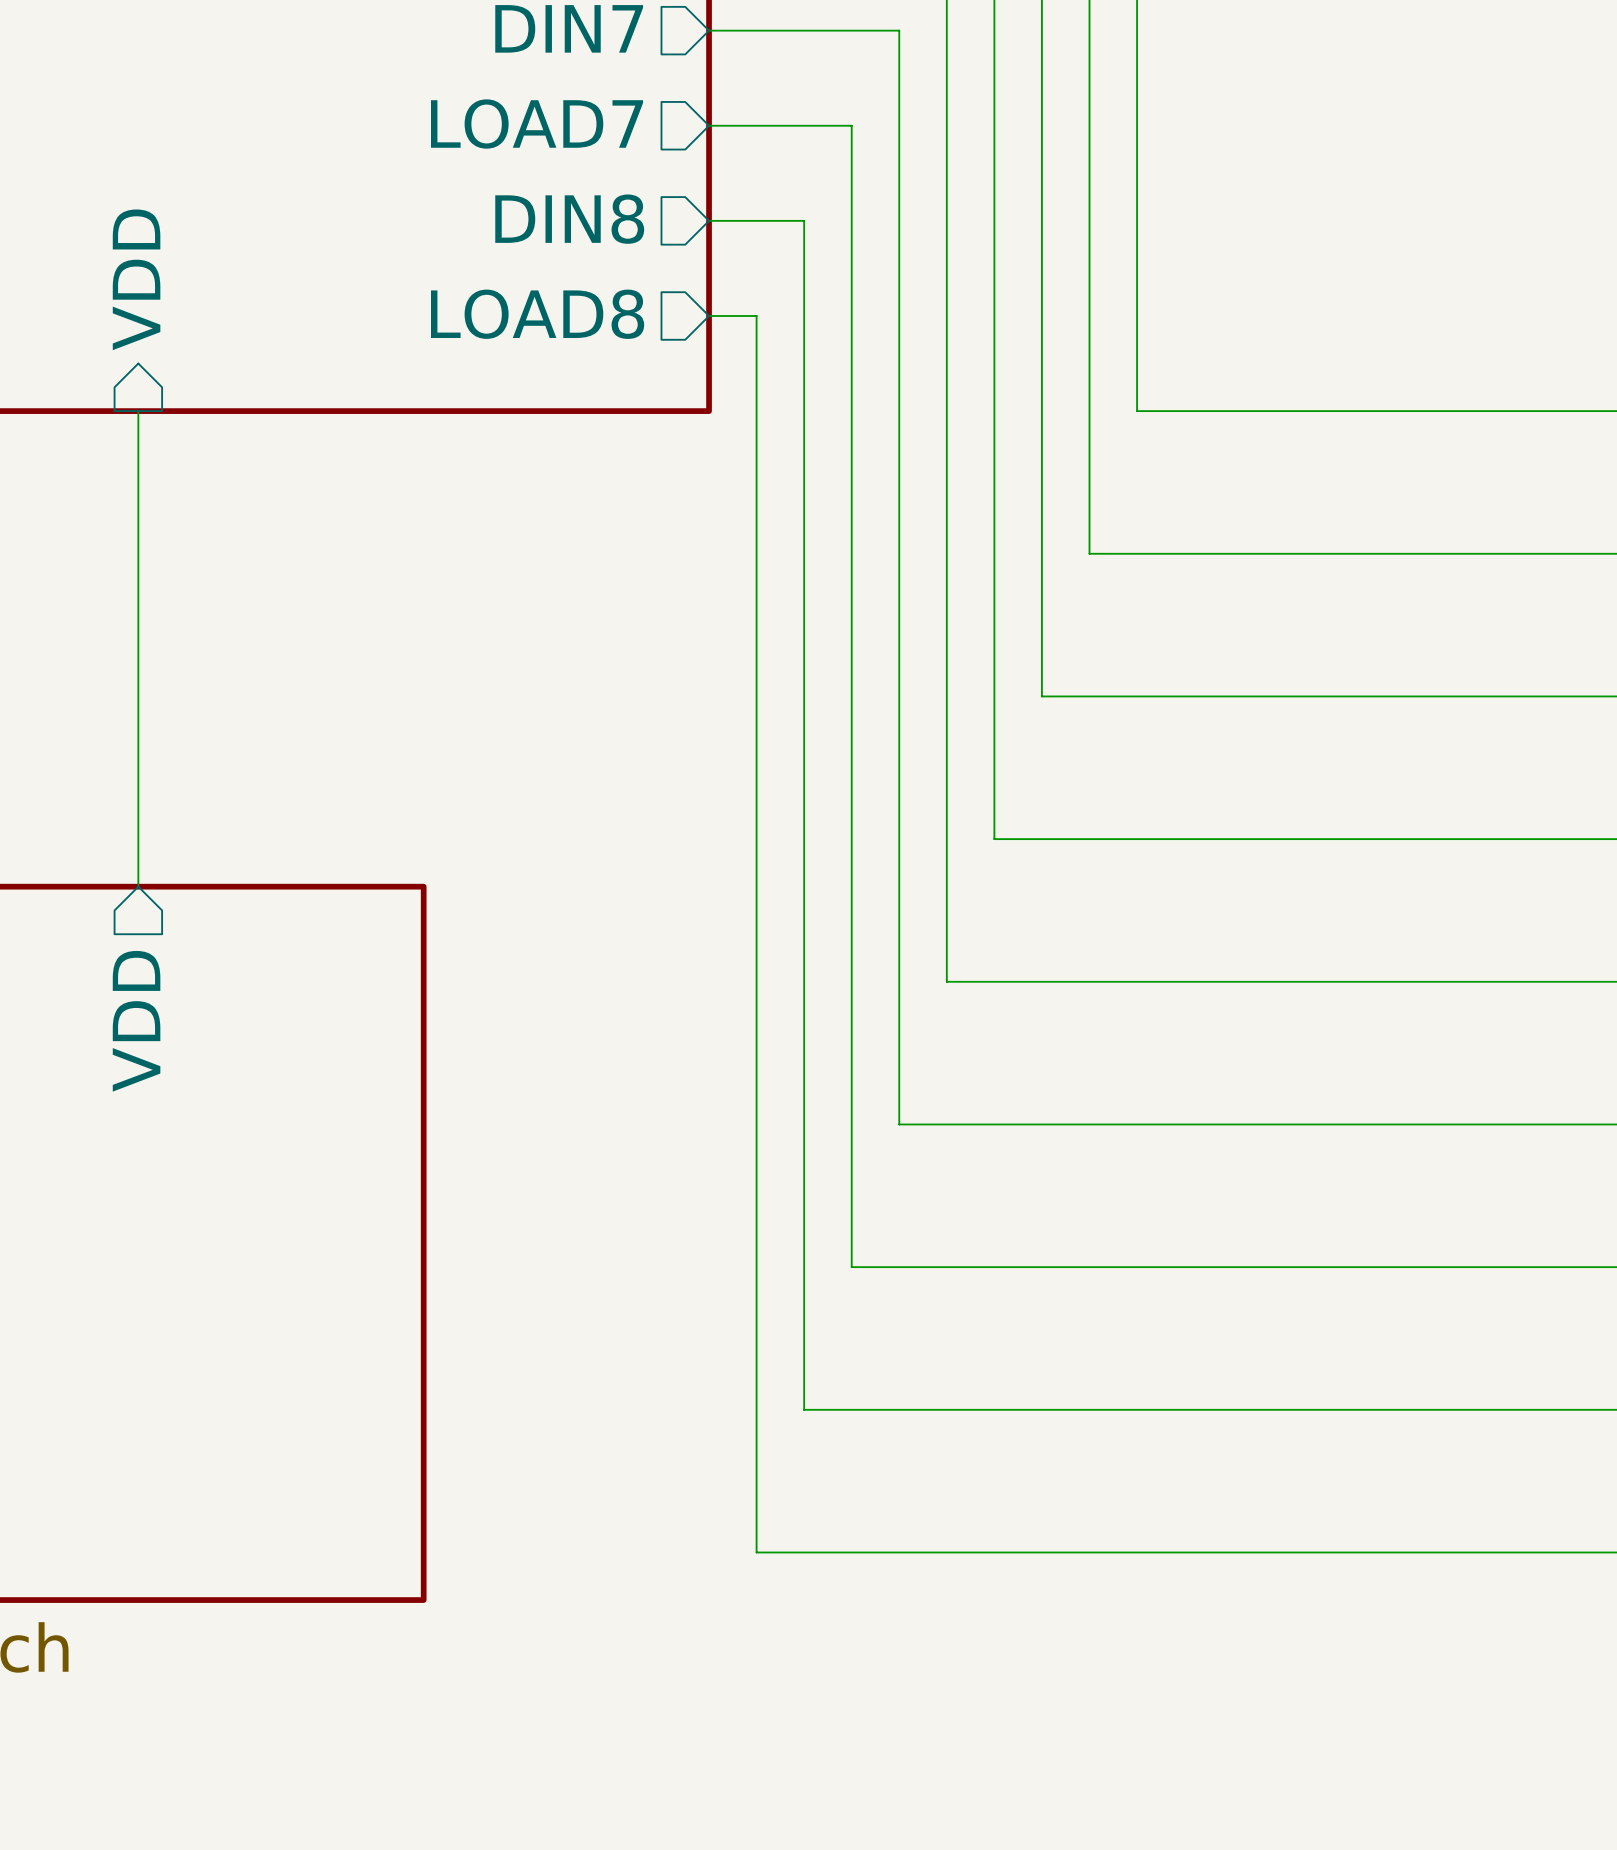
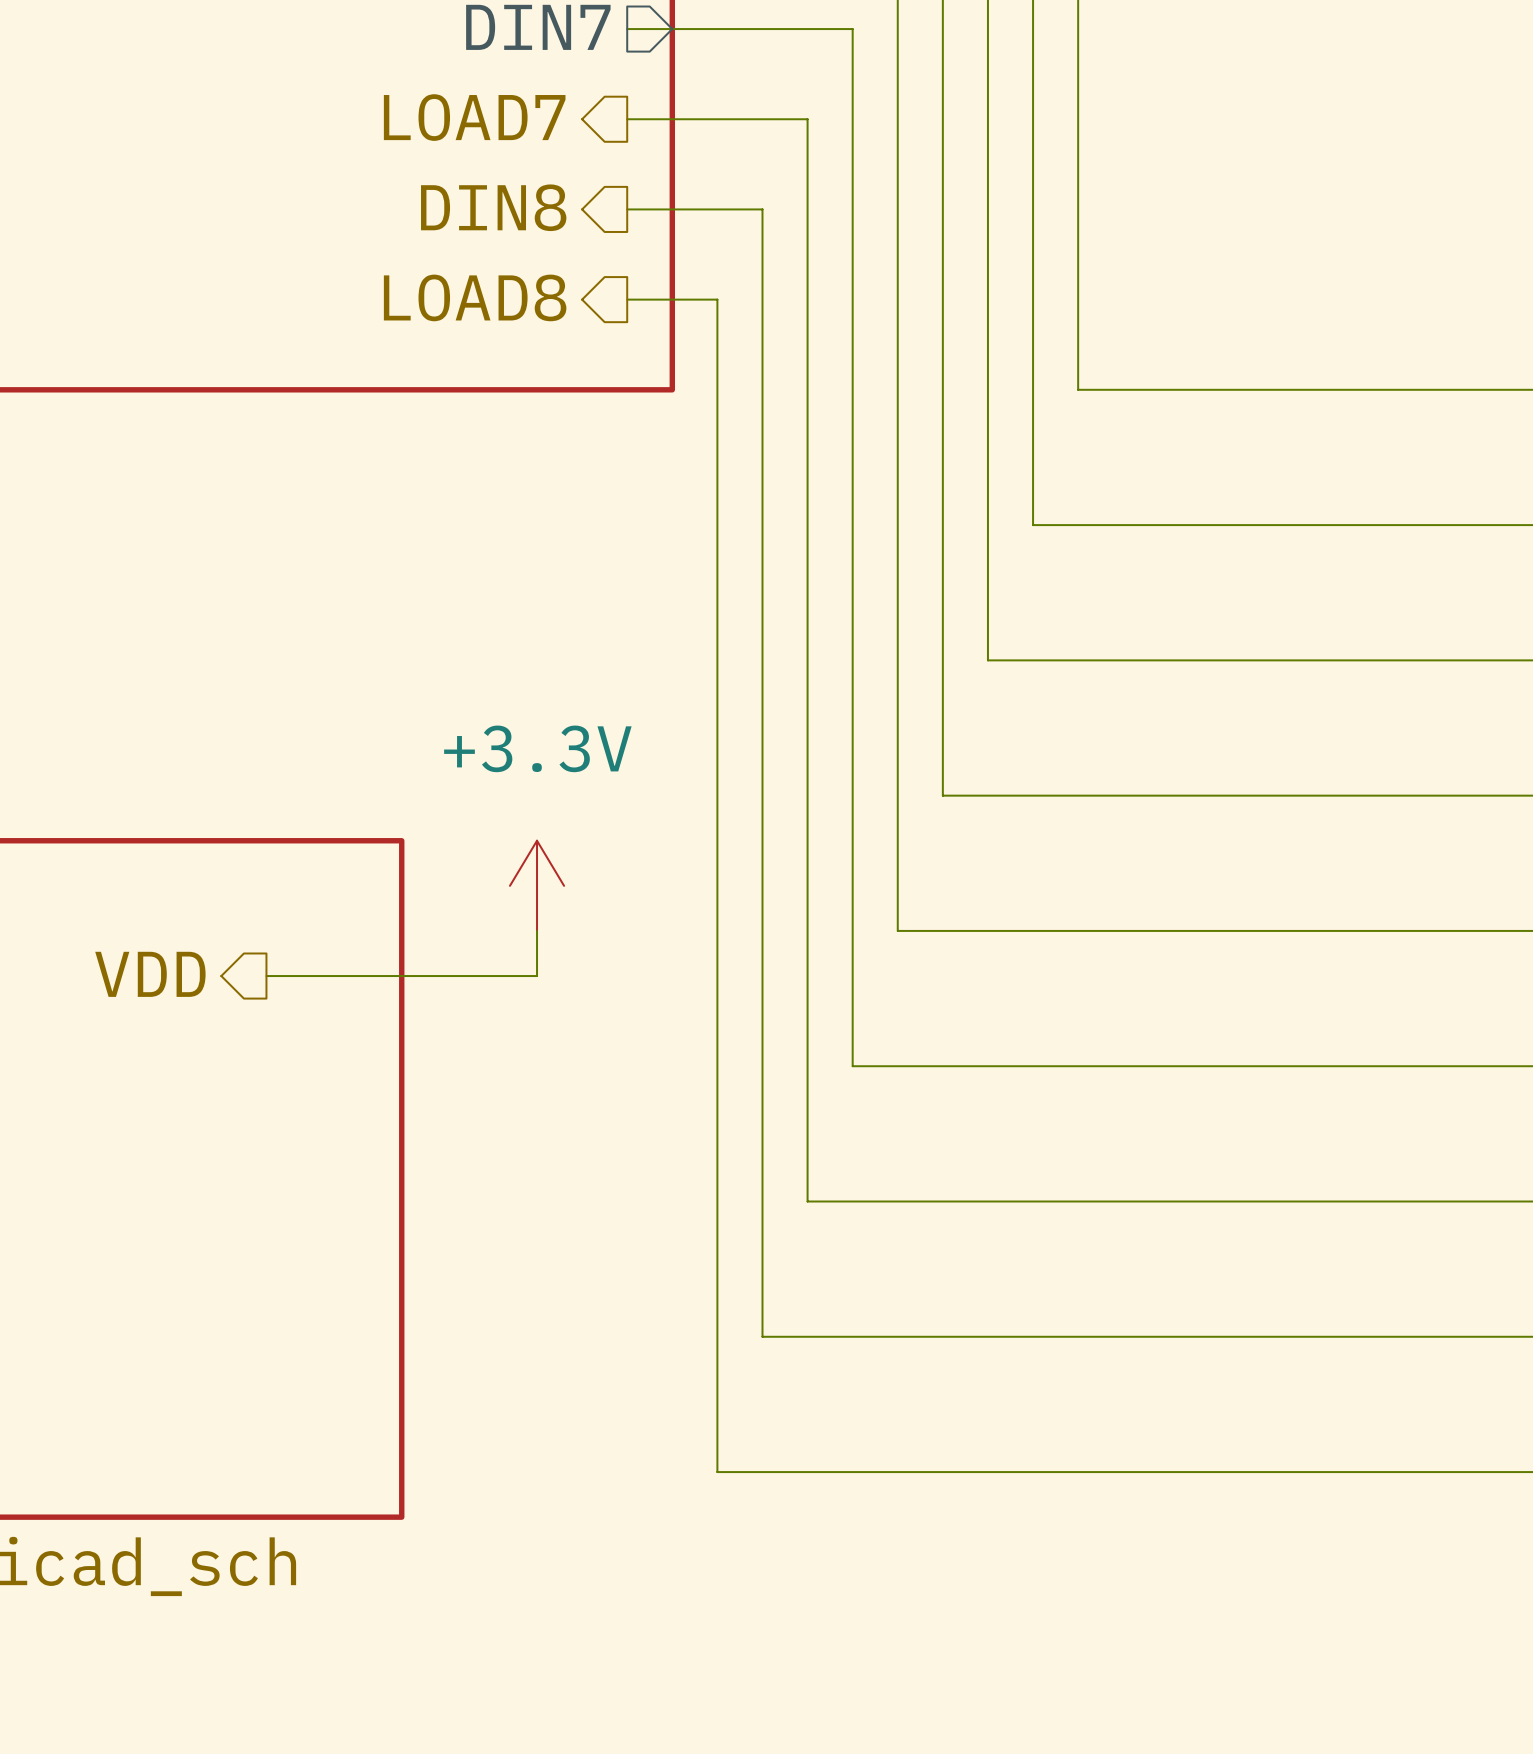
wire: none -> (627, 29) (672, 29)
hierarchical label: none -> LOAD7 (474, 117)
sheet pin: LOAD7 (537, 124) -> none
wire: none -> (627, 119) (672, 119)
hierarchical label: none -> DIN8 (493, 207)
sheet pin: DIN8 (569, 219) -> none
wire: none -> (627, 209) (672, 209)
sheet pin: VDD (136, 279) -> none
hierarchical label: none -> LOAD8 (475, 297)
sheet pin: LOAD8 (537, 314) -> none
wire: none -> (627, 299) (672, 299)
wire: (138, 411) (138, 886) -> none
power symbol: none -> +3.3V (537, 885)
wire: none -> (537, 930) (537, 976) (266, 976)
sheet pin: VDD (136, 1021) -> none
hierarchical label: none -> VDD (150, 974)

